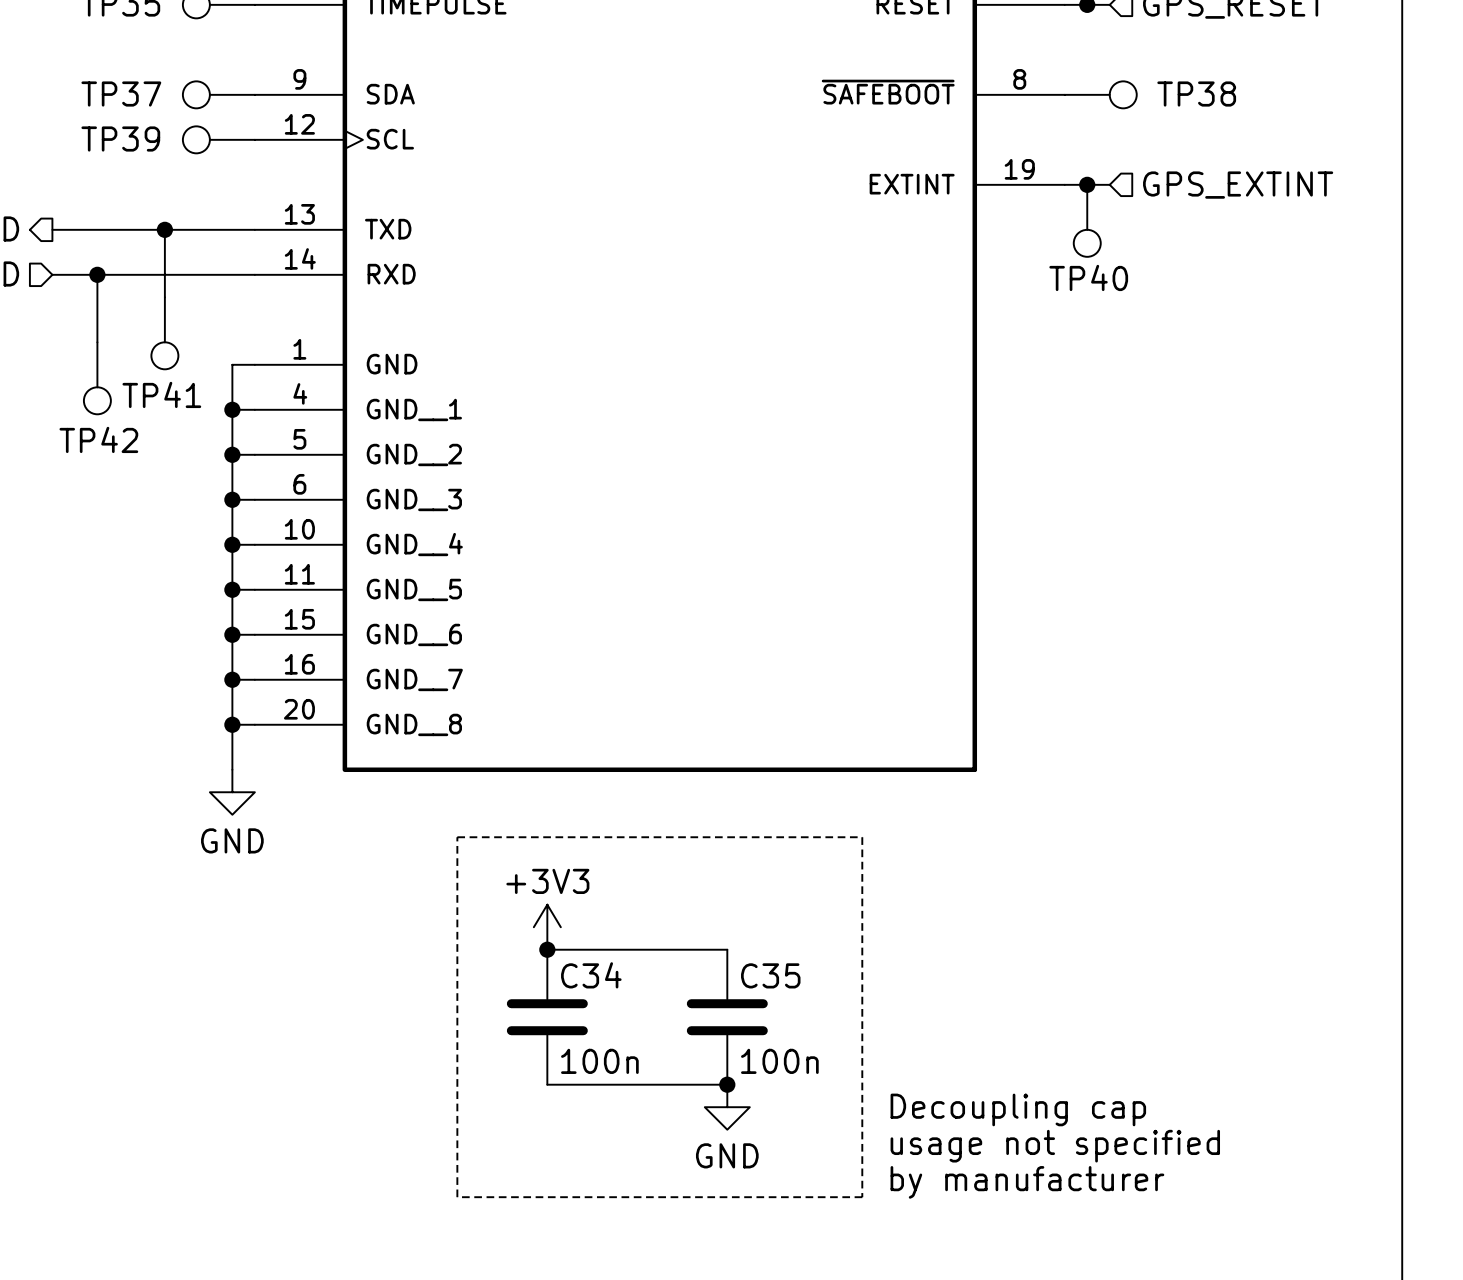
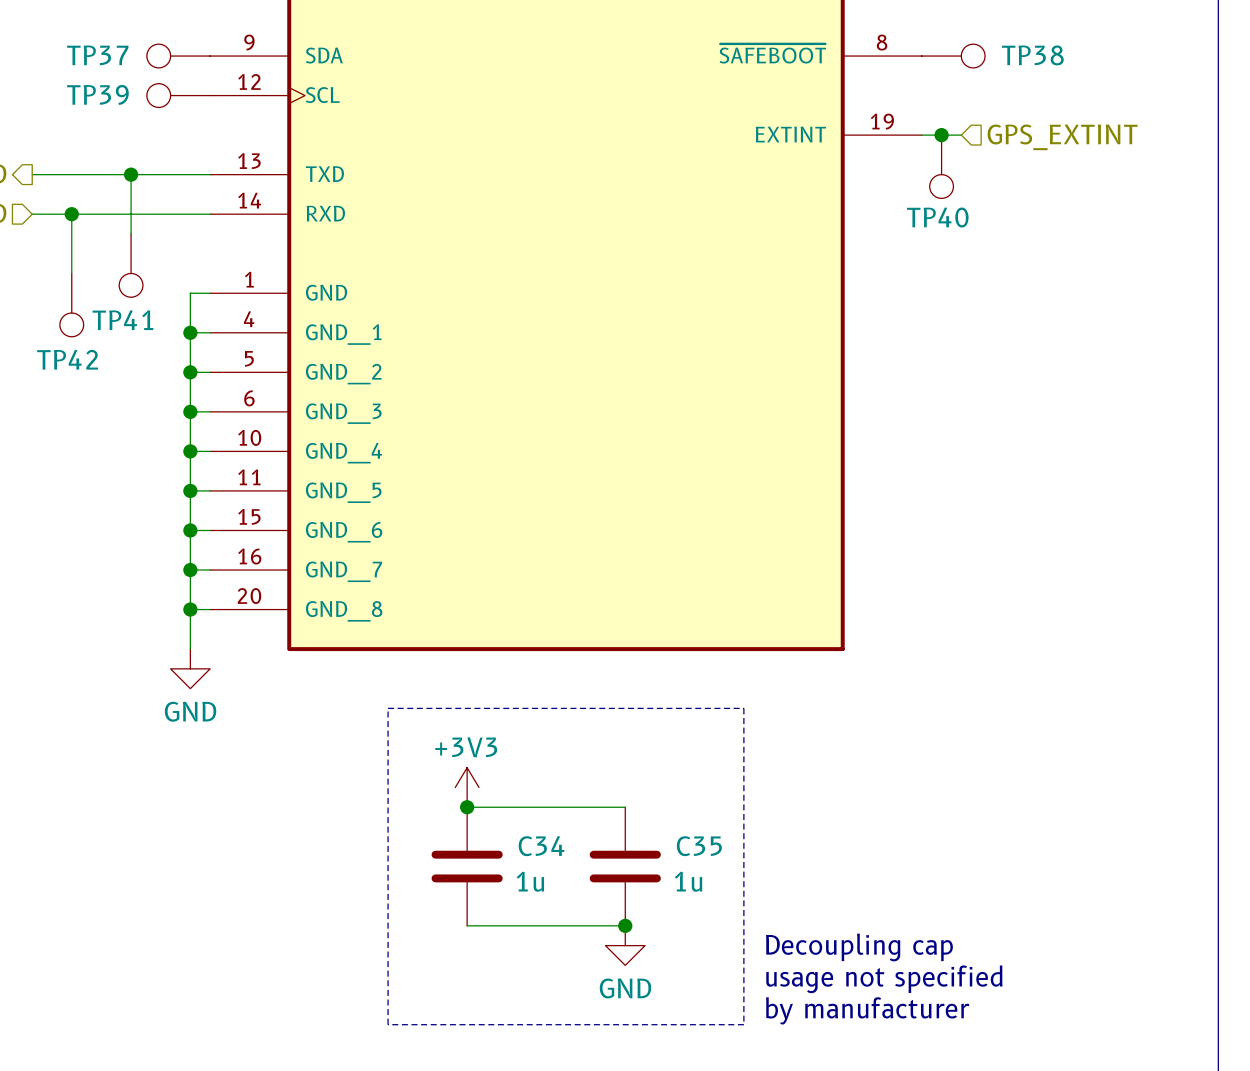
C34 name position: C34 (591, 975) -> C34 (541, 846)
C35 name position: C35 (770, 975) -> C35 (699, 846)
C34 value: 100n (599, 1061) -> 1u (530, 881)
C35 value: 100n (779, 1061) -> 1u (688, 881)

